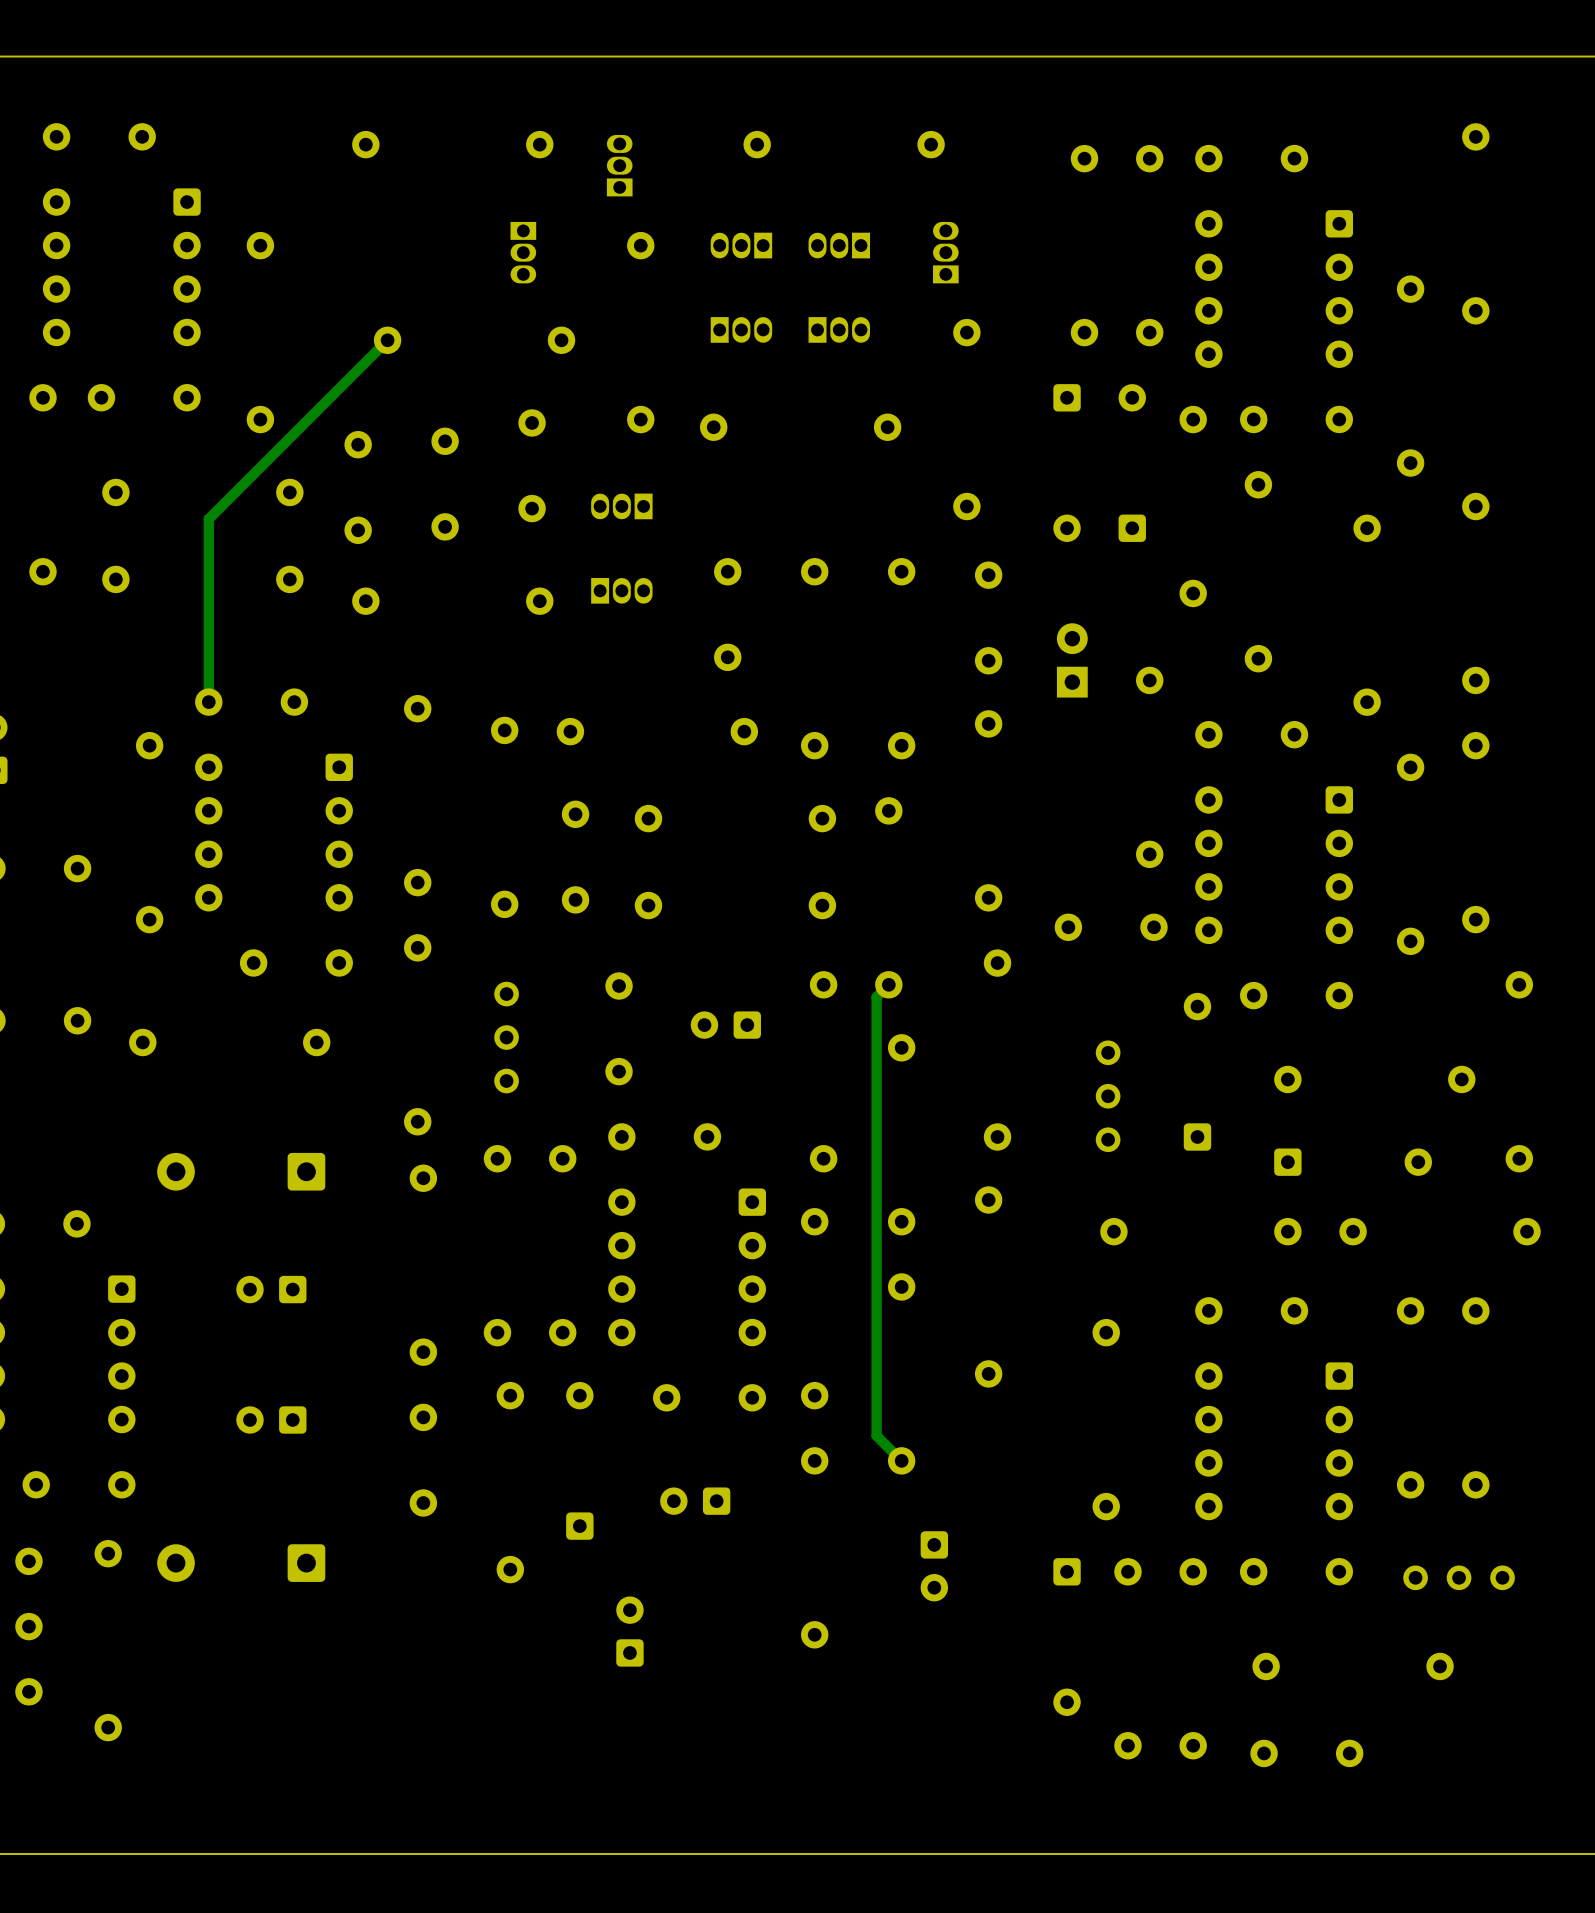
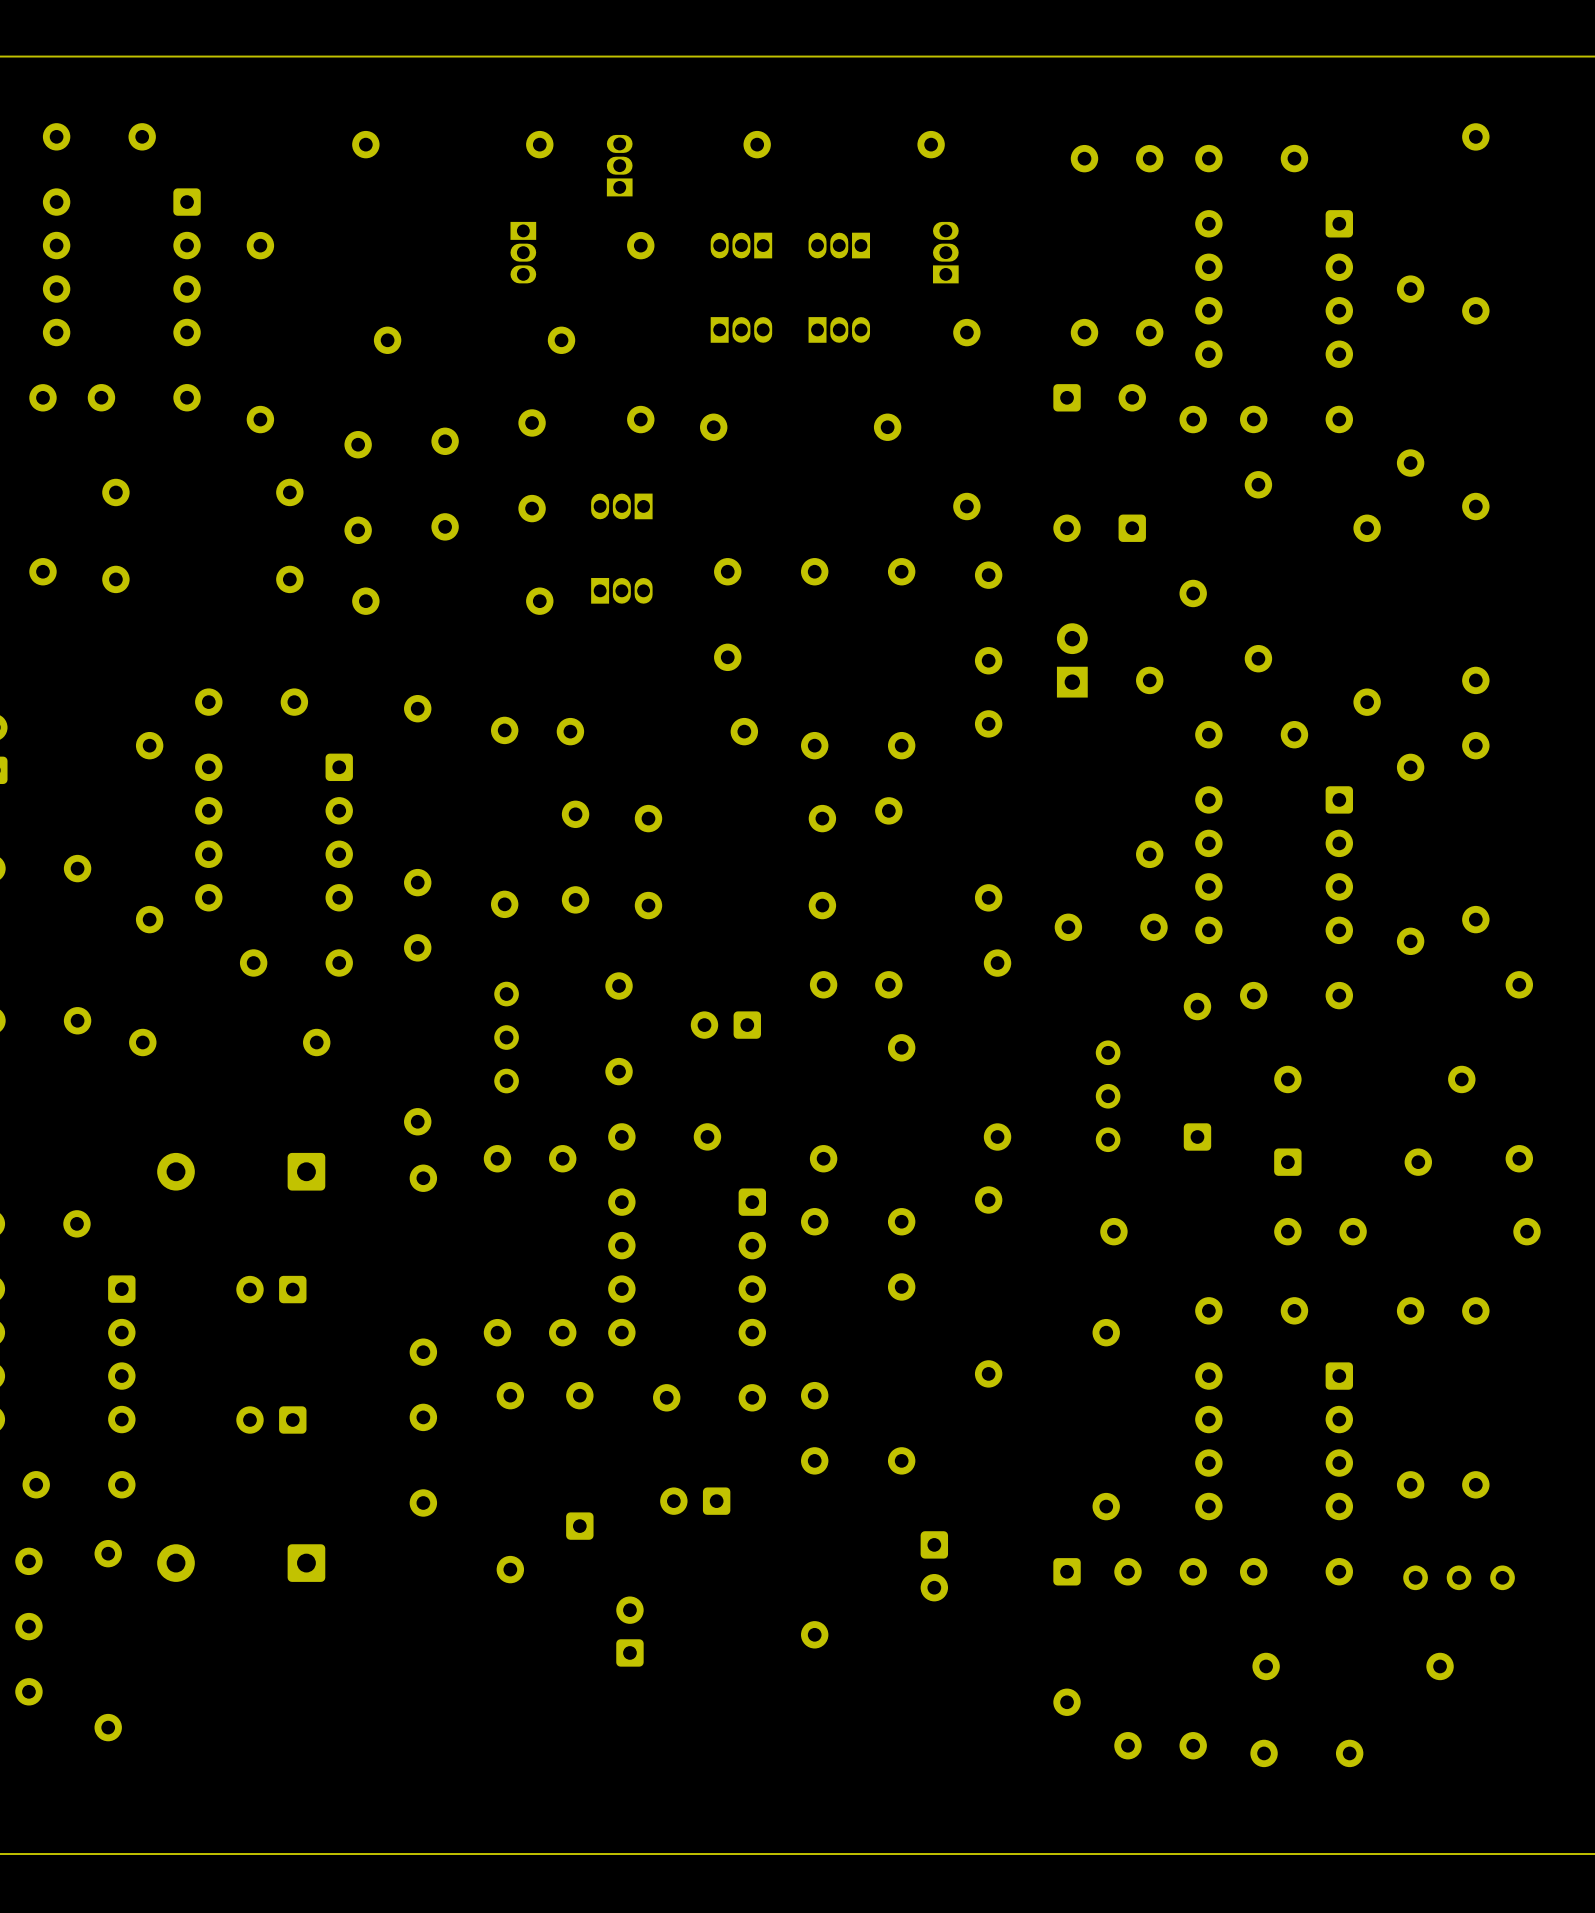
track: (387, 340) (208, 519) (208, 702) -> none
track: (888, 984) (876, 997) (876, 1435) (901, 1460) -> none

